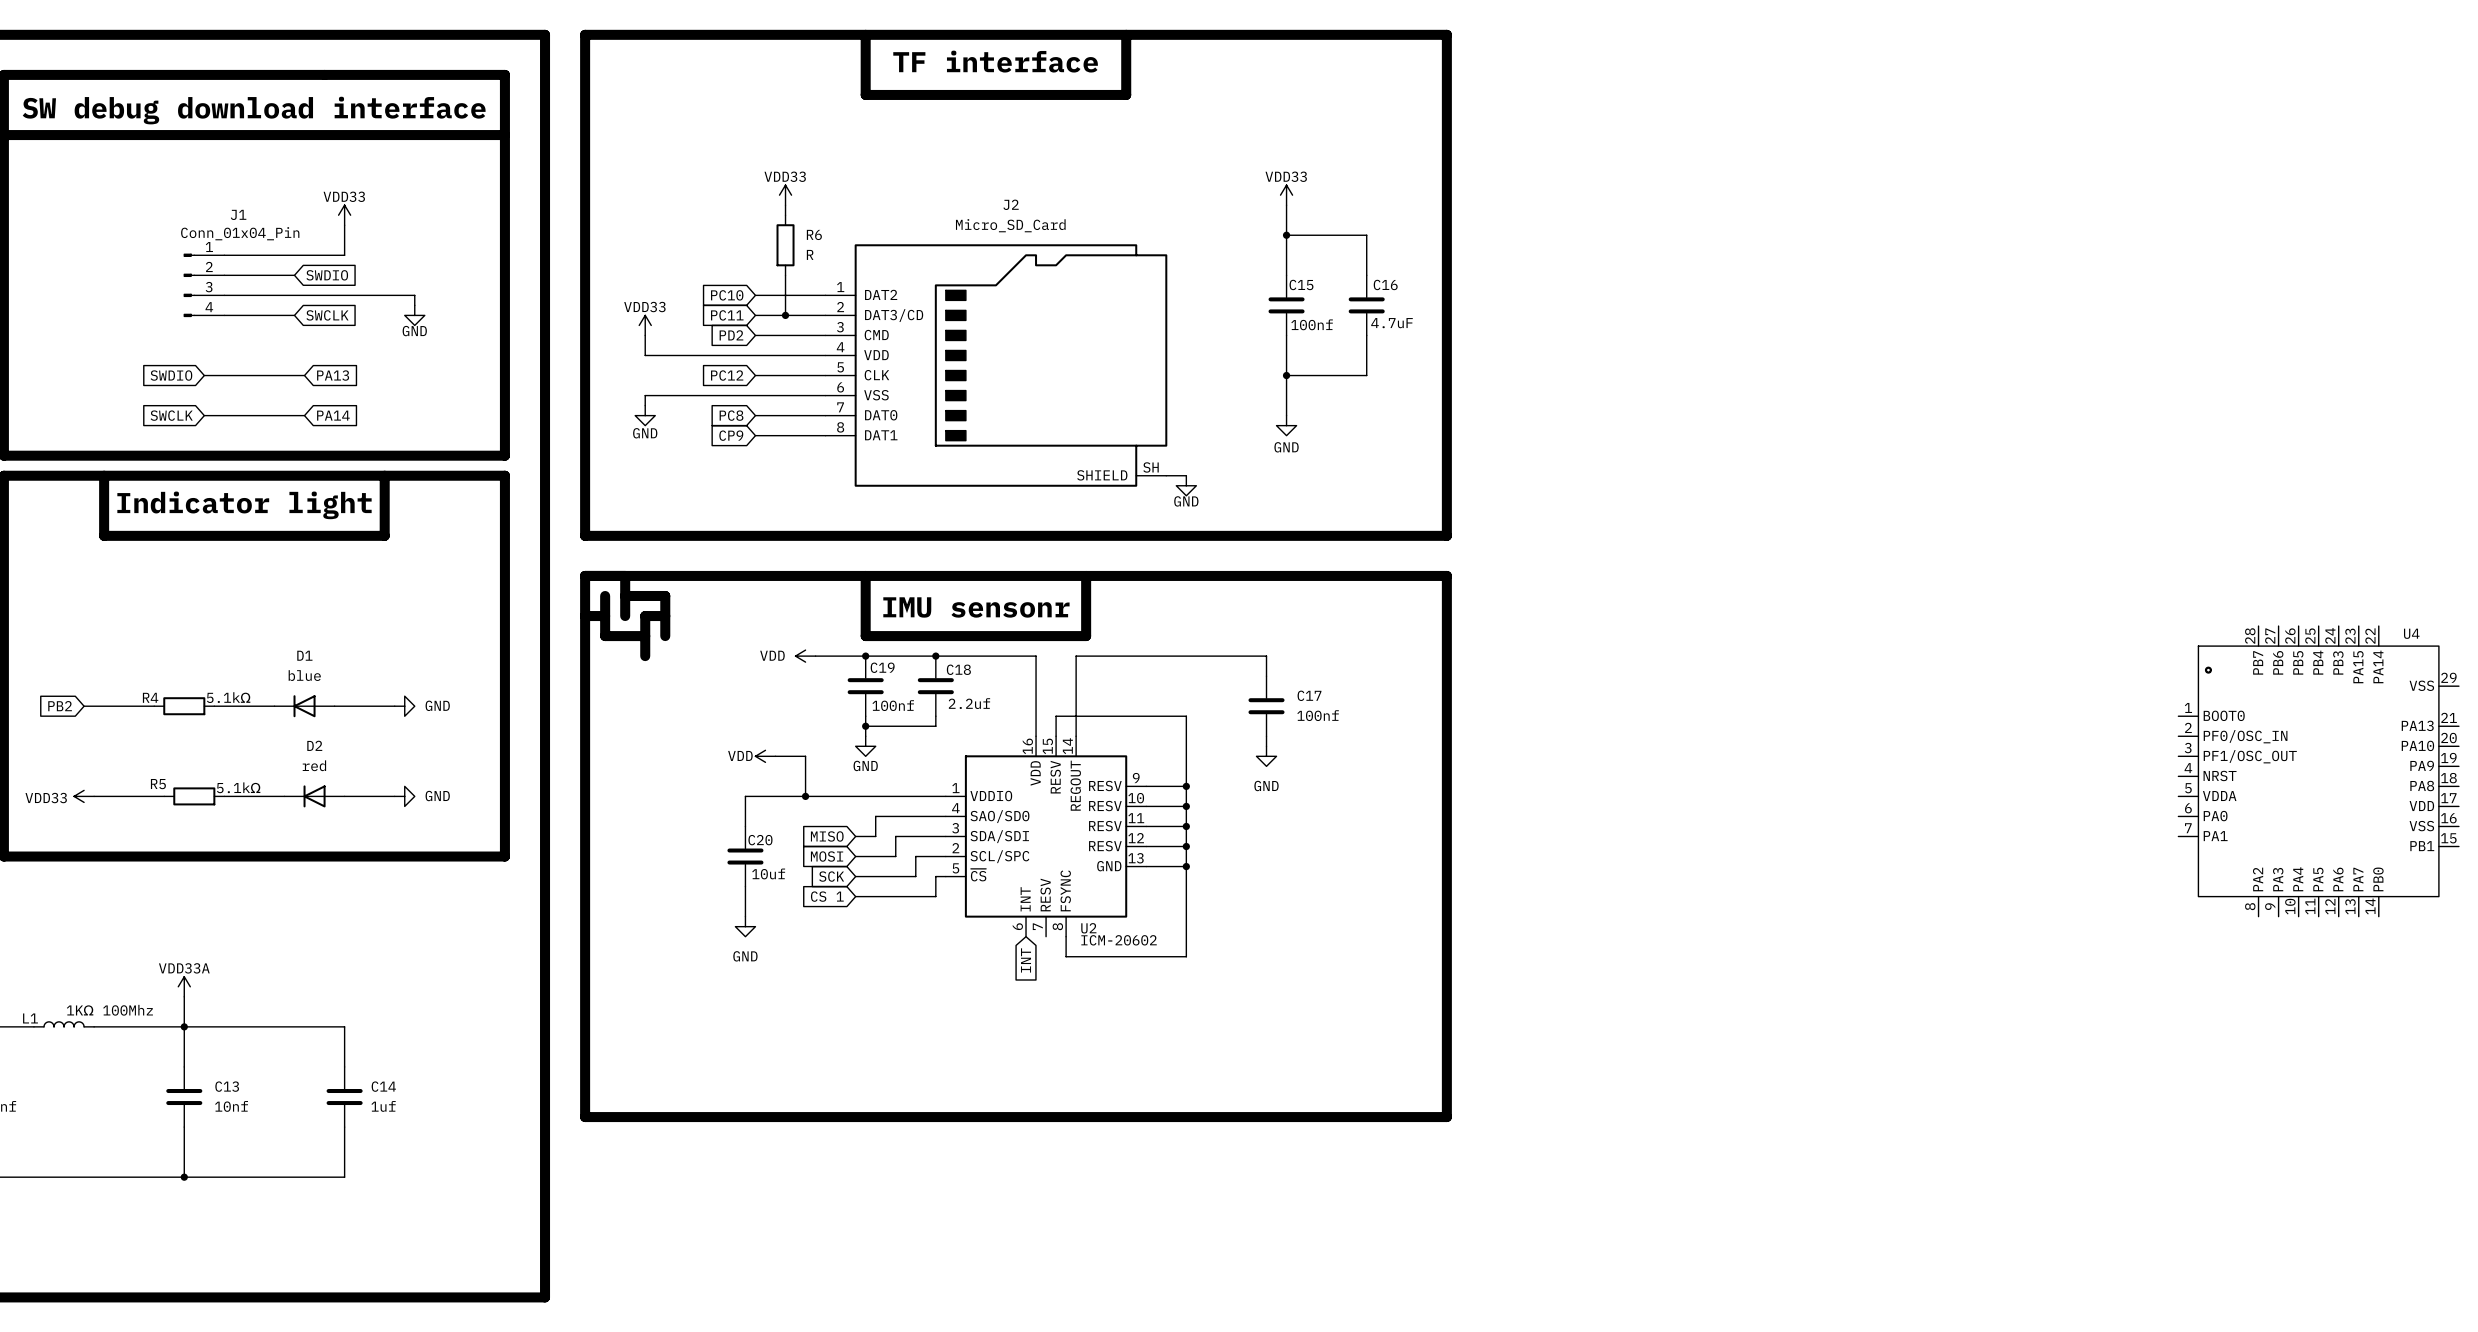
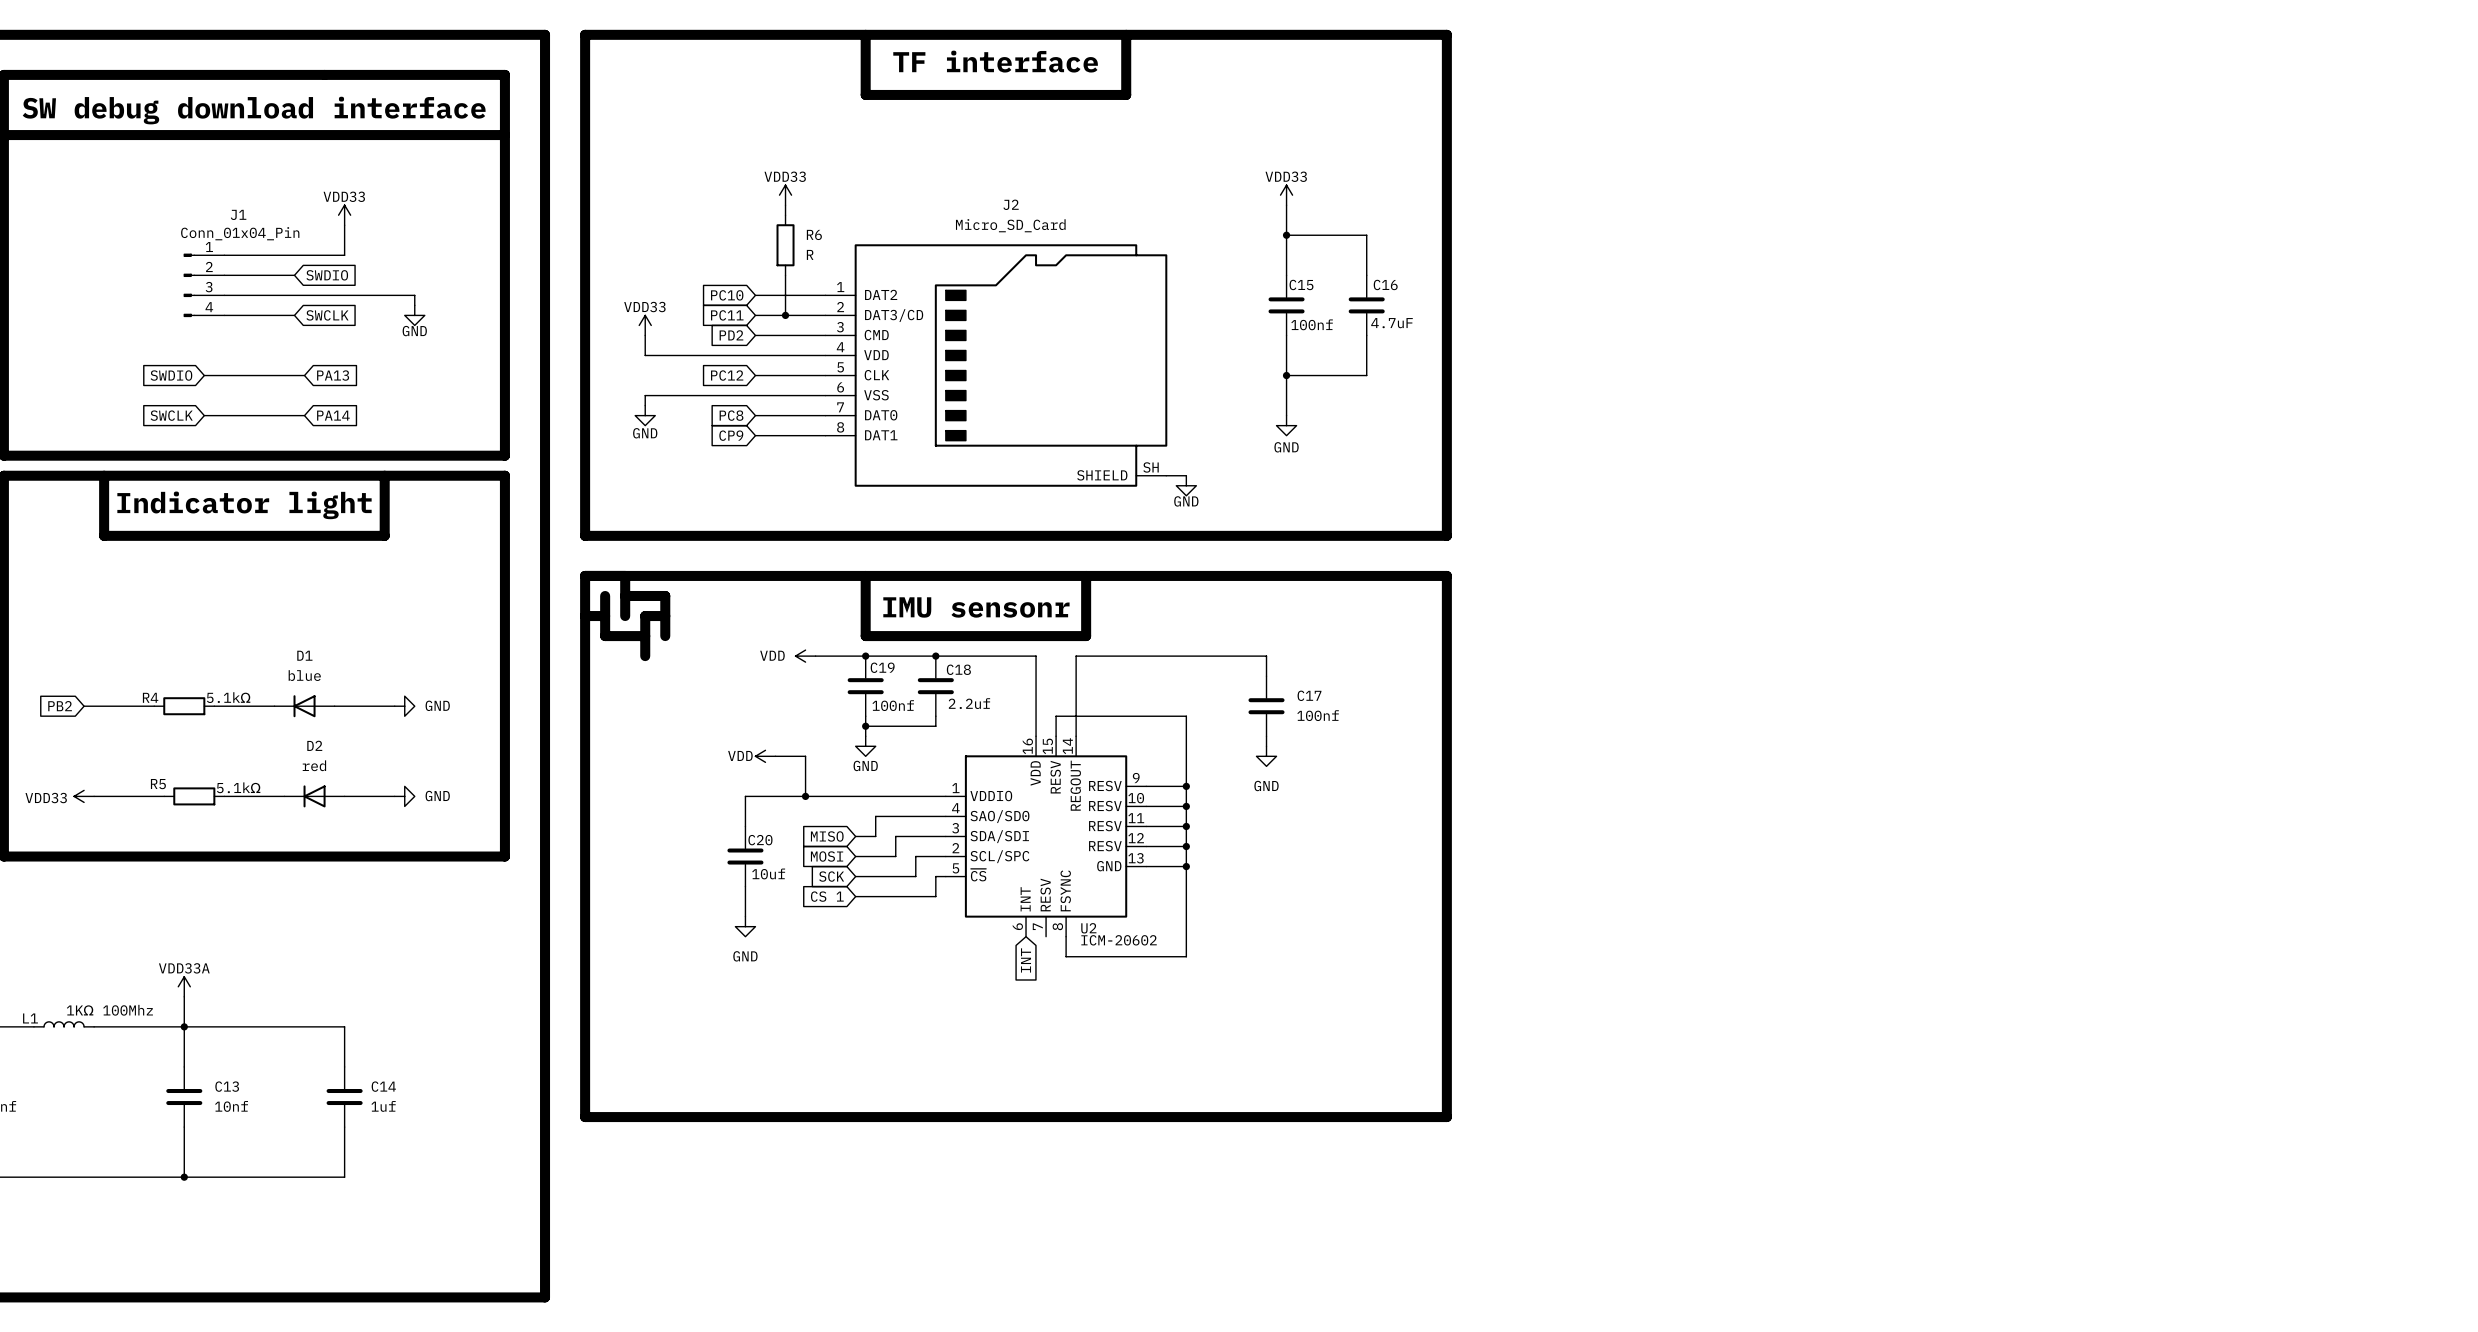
U4: (2318, 771) -> none

